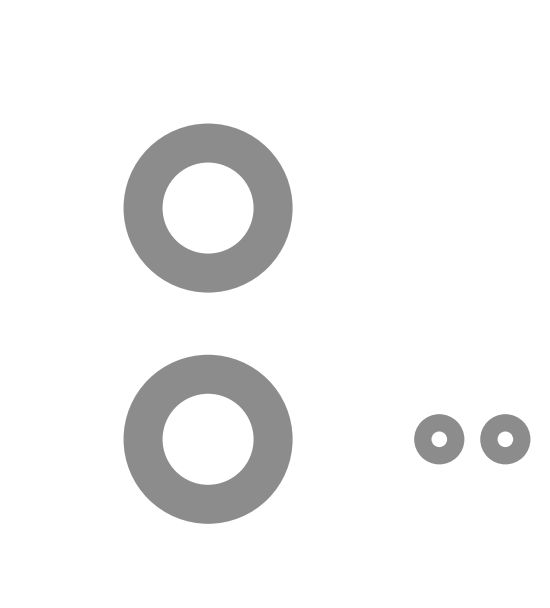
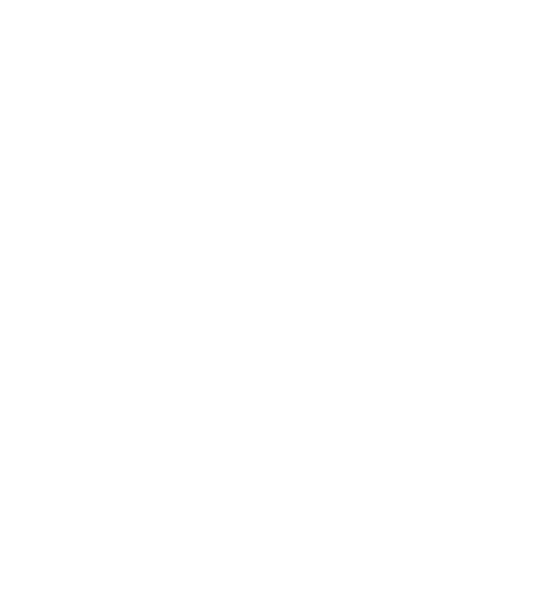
part: (208, 208) -> none
part: (208, 439) -> none
part: (472, 439) -> none

